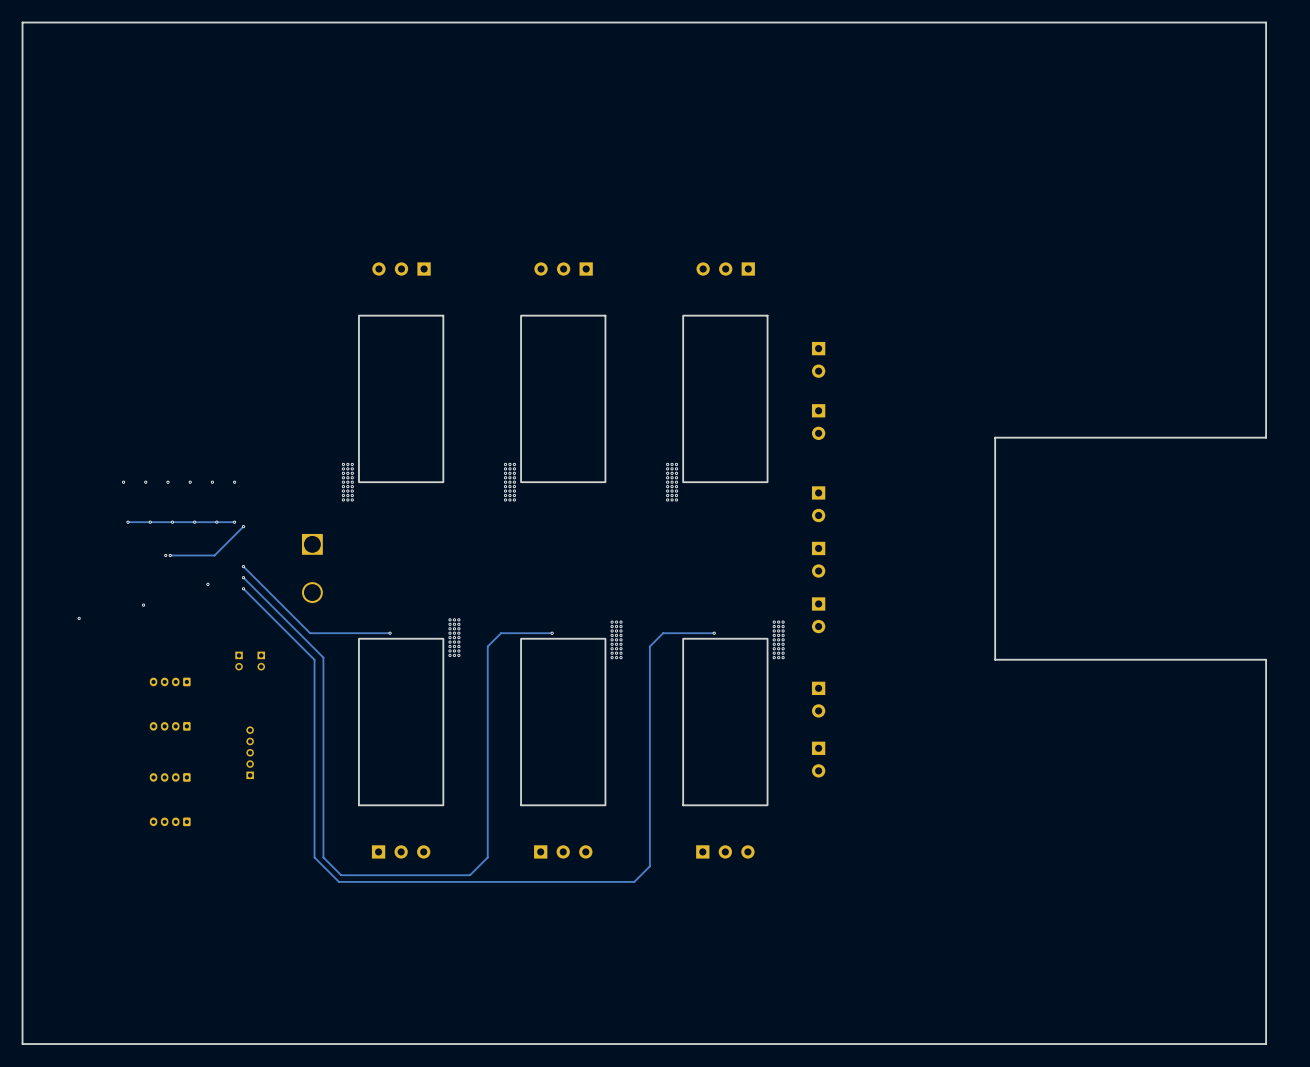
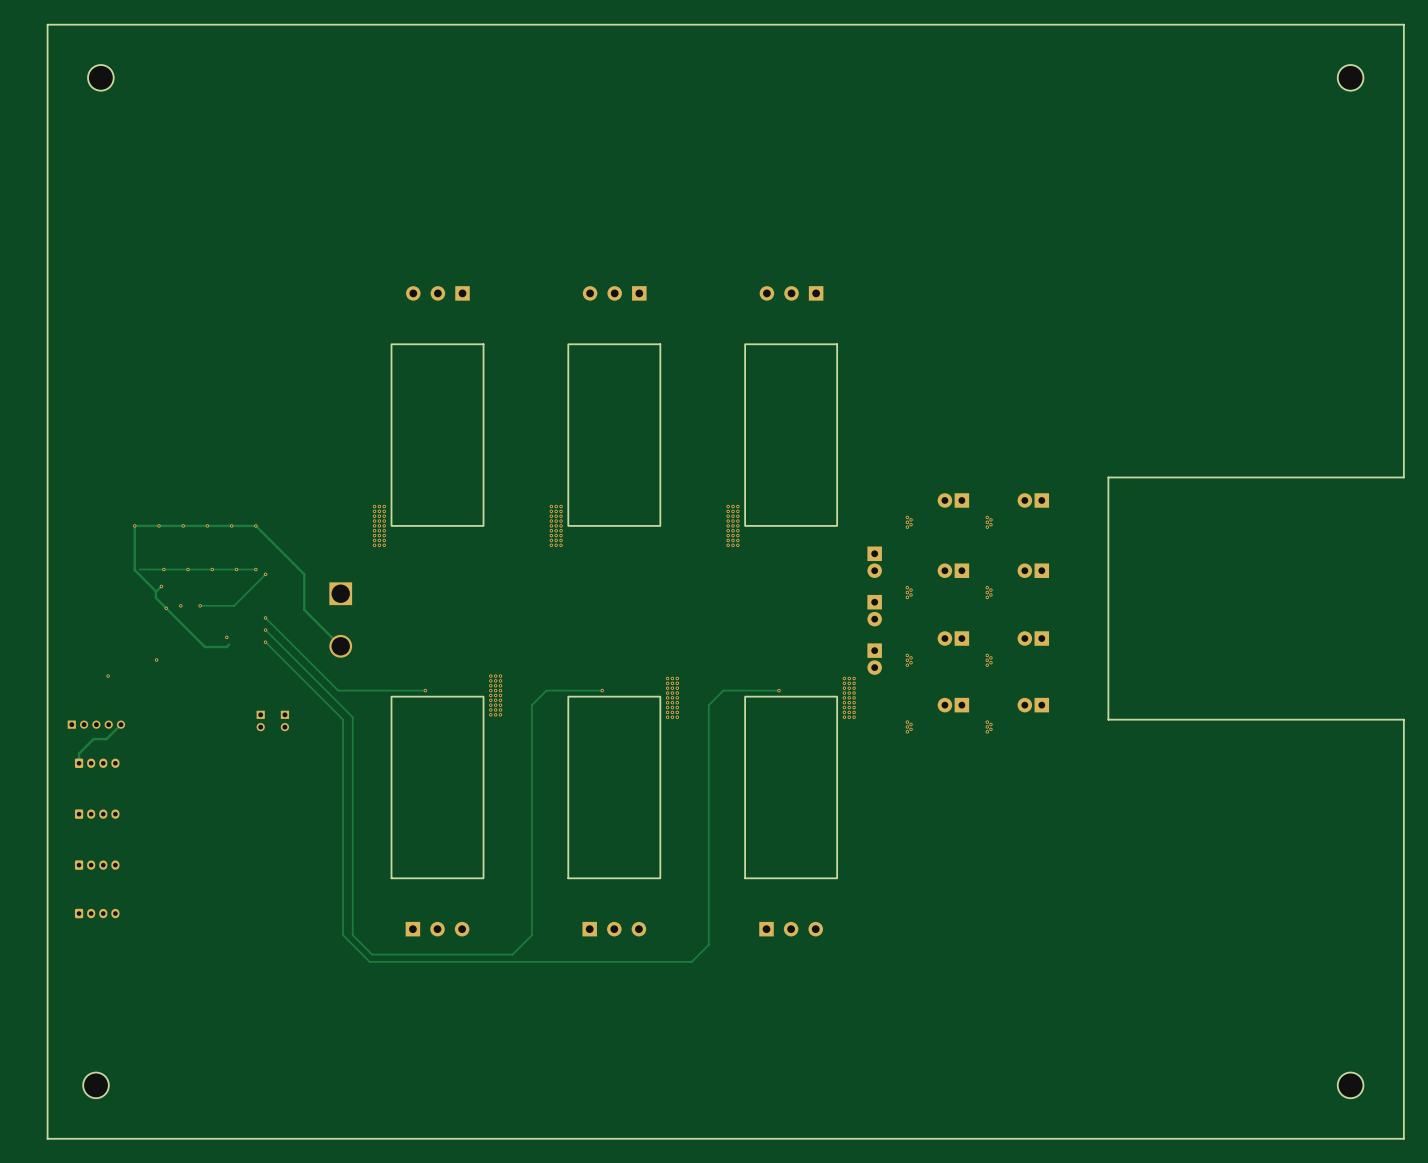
board edge: (1266, 22) (1266, 437) (995, 437) (995, 659) (1266, 659) (1266, 1044) (22, 1044) (22, 22) (1266, 22) -> (1403, 24) (1403, 477) (1108, 477) (1108, 719) (1403, 719) (1403, 1138) (47, 1138) (47, 24) (1403, 24)
part: none -> (100, 77)
part: none -> (1350, 77)
part: (818, 359) -> none
part: (818, 422) -> none
part: none -> (953, 500)
part: none -> (1033, 500)
via: none -> (907, 517)
via: none -> (987, 517)
via: none -> (911, 519)
via: none -> (990, 519)
via: none -> (907, 522)
via: none -> (987, 522)
via: none -> (911, 524)
via: none -> (990, 524)
via: none -> (907, 527)
via: none -> (987, 527)
part: (818, 504) -> none
part: none -> (874, 562)
via: (128, 522) -> none
part: none -> (953, 570)
part: none -> (1033, 570)
track: none -> (161, 586) (155, 591)
via: none -> (161, 586)
via: none -> (907, 587)
via: none -> (987, 587)
via: none -> (911, 590)
via: none -> (990, 590)
track: none -> (155, 591) (155, 597) (205, 647) (226, 647) (229, 644)
track: none -> (155, 591) (134, 570) (134, 525) (255, 525) (304, 574) (304, 609) (340, 646)
via: none -> (907, 592)
via: none -> (987, 592)
via: none -> (911, 594)
via: none -> (990, 594)
via: none -> (907, 597)
via: none -> (987, 597)
via: (170, 555) -> none
track: (183, 555) (170, 555) -> none
via: none -> (200, 605)
via: none -> (166, 608)
part: none -> (874, 610)
part: (818, 559) -> none
part: none -> (953, 638)
part: none -> (1033, 638)
via: none -> (907, 655)
via: none -> (987, 655)
via: none -> (911, 657)
via: none -> (990, 657)
part: none -> (874, 659)
via: none -> (907, 660)
via: none -> (987, 660)
via: none -> (911, 662)
via: none -> (990, 662)
via: none -> (907, 665)
via: none -> (987, 665)
part: (818, 615) -> none
via position: (79, 618) -> (108, 676)
part: none -> (953, 705)
part: none -> (1033, 705)
via: none -> (907, 722)
via: none -> (987, 722)
part: none -> (96, 724)
track: none -> (121, 724) (106, 739) (93, 739) (79, 753) (79, 763)
via: none -> (911, 724)
via: none -> (990, 724)
via: none -> (907, 726)
via: none -> (987, 726)
via: none -> (911, 729)
via: none -> (990, 729)
via: none -> (907, 731)
via: none -> (987, 731)
part: (170, 681) -> none
part: none -> (97, 763)
part: (818, 699) -> none
part: (170, 726) -> none
part: none -> (97, 814)
part: (250, 752) -> none
part: (818, 759) -> none
part: (170, 777) -> none
part: none -> (97, 865)
part: (170, 821) -> none
part: none -> (97, 913)
part: none -> (96, 1085)
part: none -> (1350, 1085)

